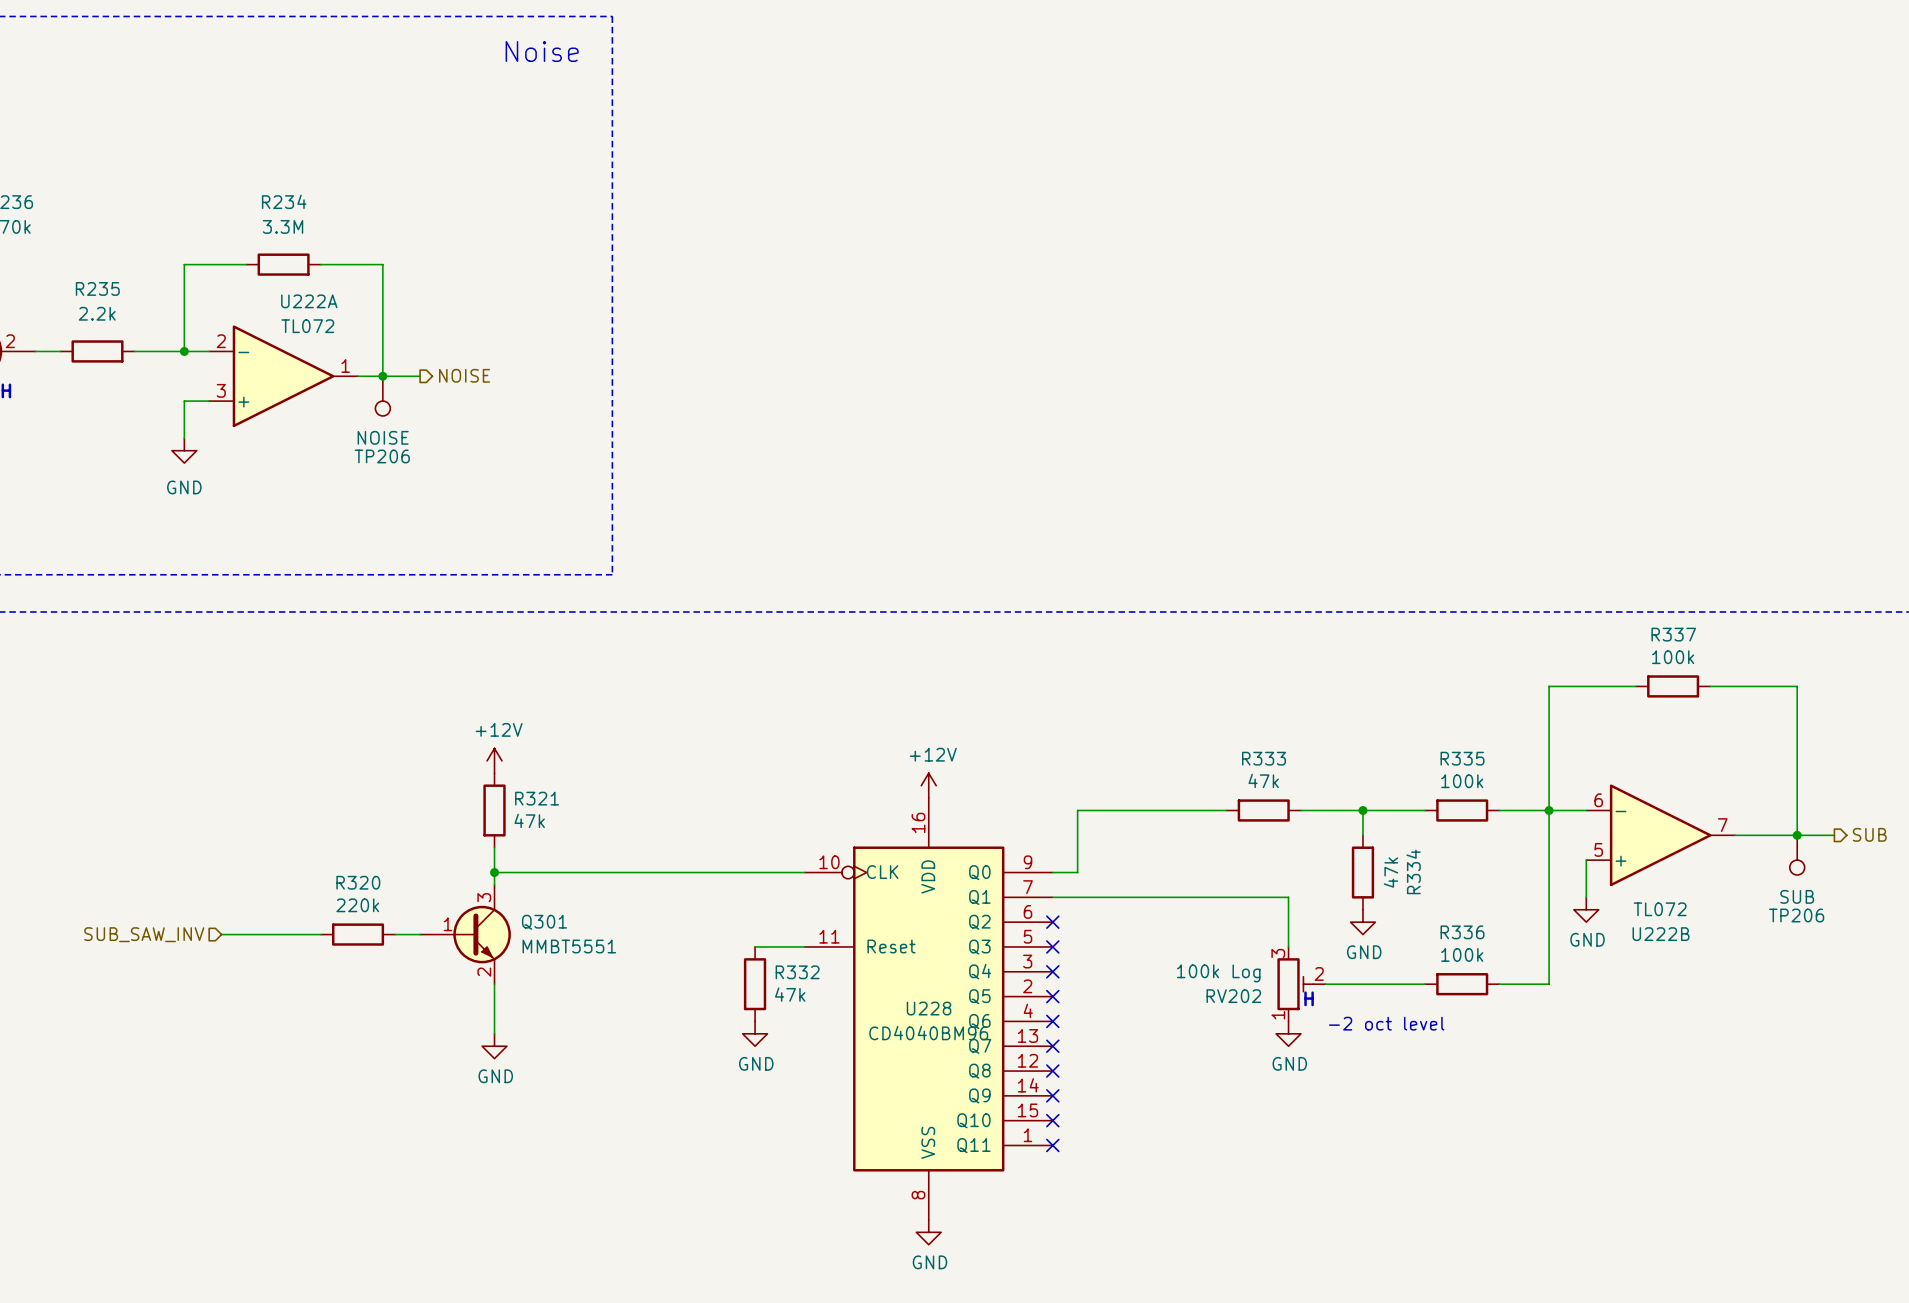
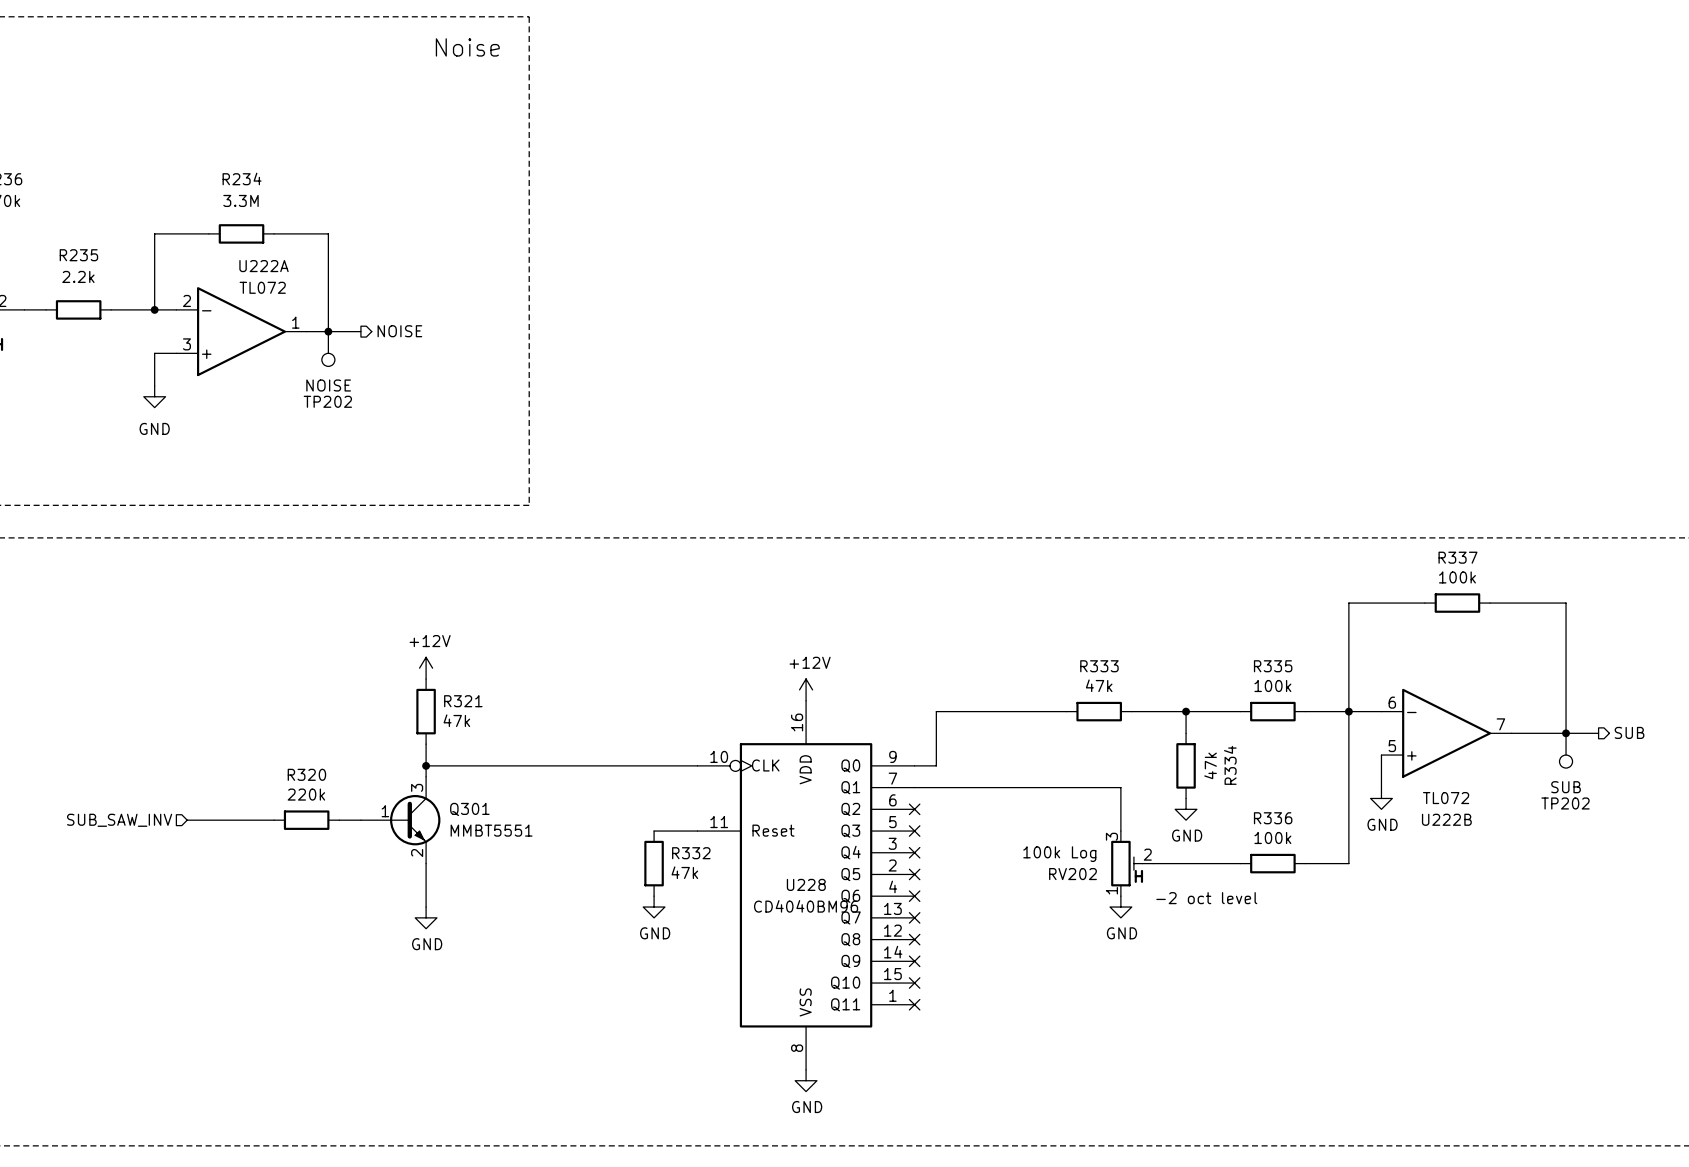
TP206 name: TP206 (382, 456) -> TP202 (327, 401)
TP206 name: TP206 (1796, 915) -> TP202 (1565, 803)

